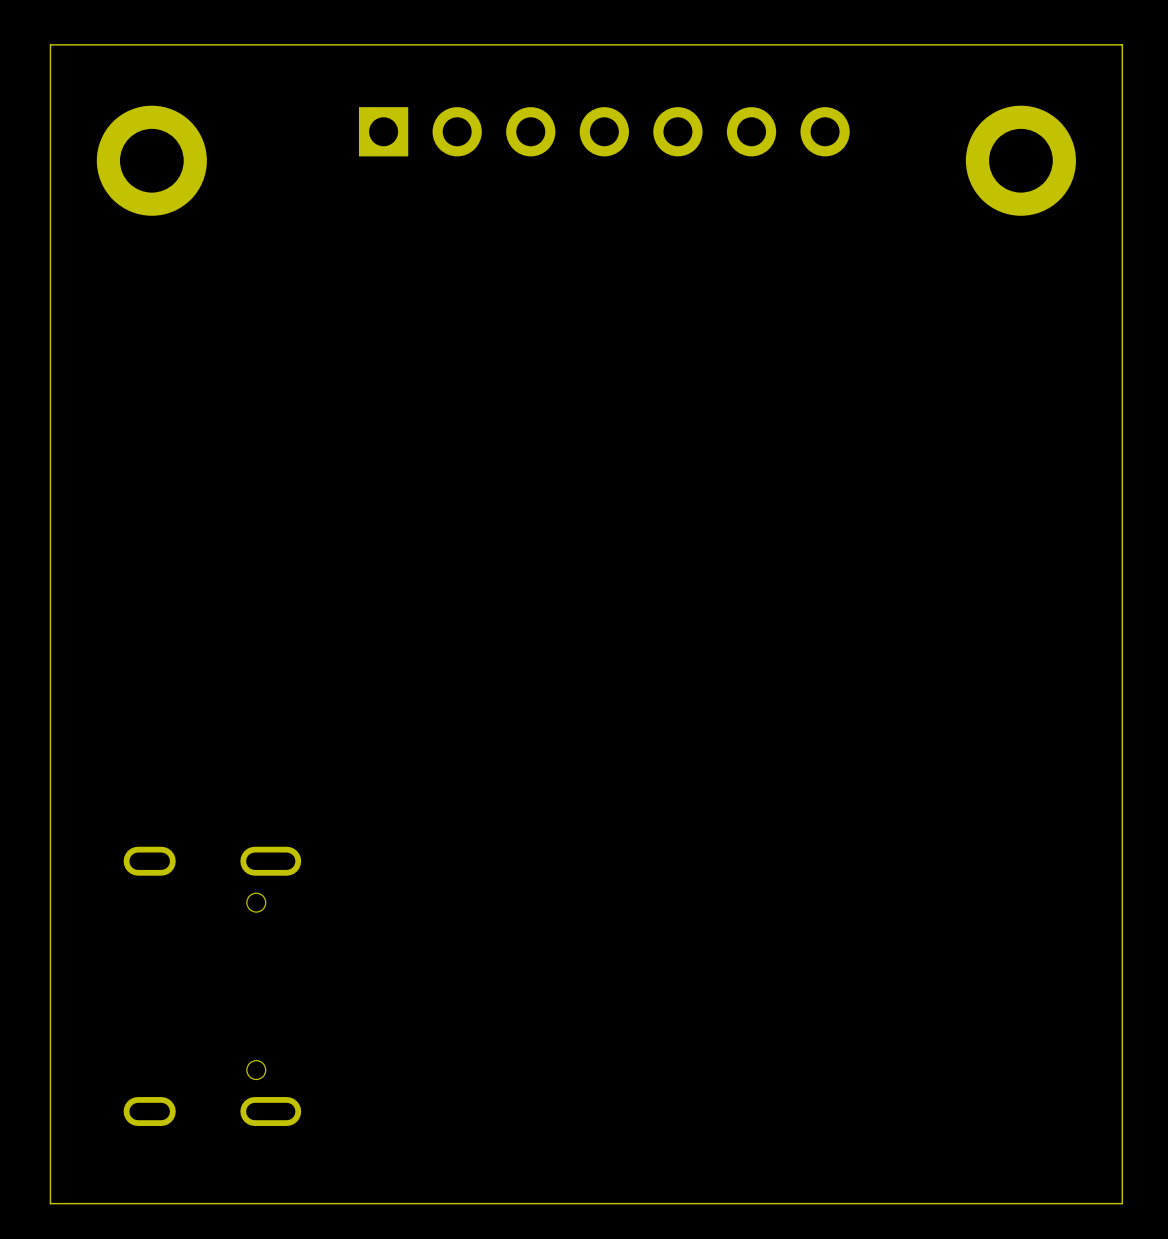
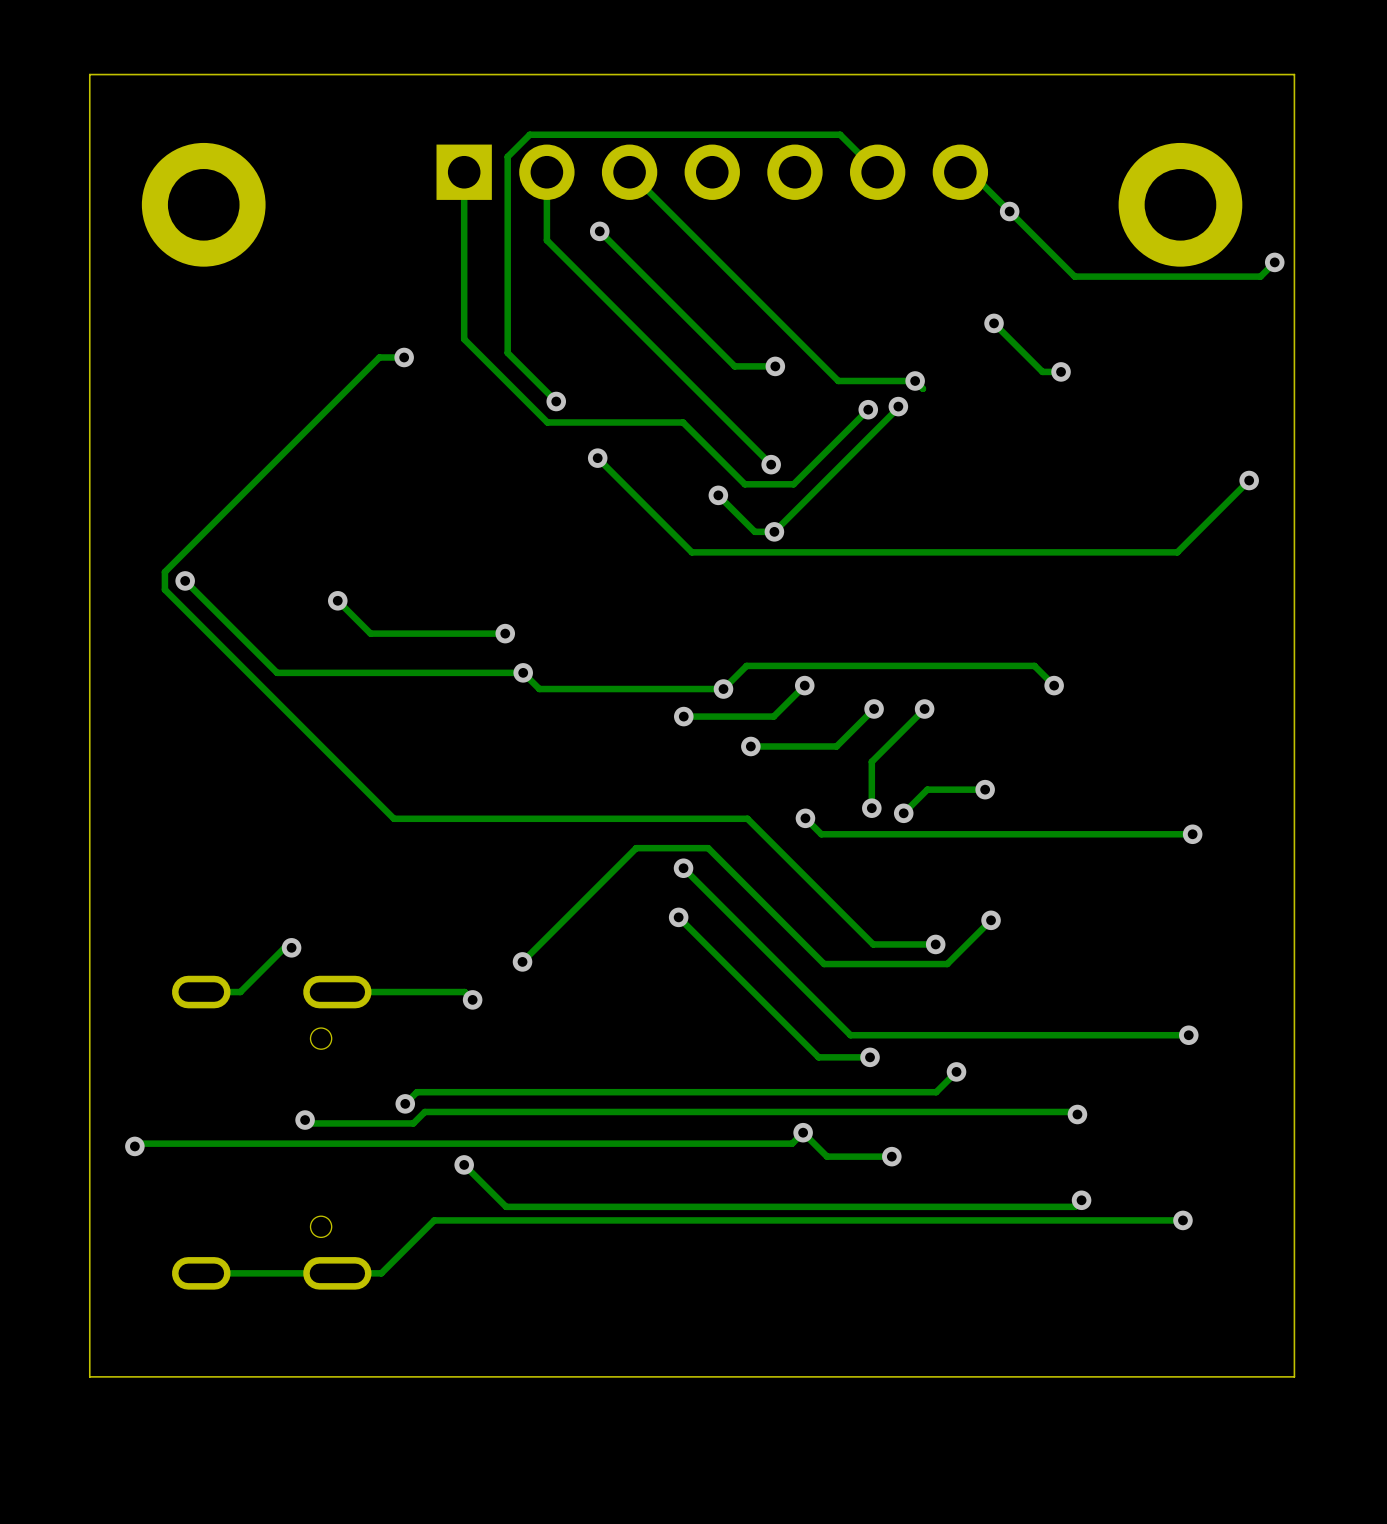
track: none -> (464, 172) (464, 339) (547, 422) (683, 422) (744, 484) (793, 484) (868, 409)
track: none -> (546, 172) (546, 240) (771, 464)
track: none -> (629, 172) (838, 380) (915, 380) (922, 388)
track: none -> (877, 172) (840, 134) (529, 134) (507, 156) (507, 352) (556, 401)
track: none -> (960, 172) (970, 172) (1074, 276) (1260, 276) (1274, 262)
via: none -> (1009, 211)
track: none -> (599, 231) (734, 366) (775, 366)
via: none -> (599, 231)
via: none -> (1274, 262)
track: none -> (994, 323) (1042, 371) (1061, 371)
via: none -> (994, 323)
track: none -> (404, 357) (379, 357) (164, 572) (164, 589) (393, 818) (747, 818) (873, 944) (935, 944)
via: none -> (404, 357)
via: none -> (775, 366)
via: none -> (1061, 371)
via: none -> (915, 380)
via: none -> (556, 401)
track: none -> (897, 405) (898, 407) (774, 531) (754, 531) (718, 495)
via: none -> (898, 406)
via: none -> (868, 409)
track: none -> (597, 458) (691, 552) (1177, 552) (1249, 480)
via: none -> (597, 458)
via: none -> (771, 464)
via: none -> (1249, 480)
via: none -> (718, 495)
via: none -> (774, 531)
track: none -> (185, 580) (277, 672) (523, 672) (539, 689) (723, 689) (746, 665) (1034, 665) (1054, 685)
via: none -> (185, 580)
track: none -> (337, 600) (370, 633) (505, 633)
via: none -> (337, 600)
via: none -> (505, 633)
via: none -> (523, 672)
track: none -> (804, 685) (773, 716) (683, 716)
via: none -> (804, 685)
via: none -> (1054, 685)
via: none -> (723, 689)
track: none -> (874, 708) (836, 746) (750, 746)
via: none -> (874, 708)
track: none -> (924, 709) (871, 761) (871, 808)
via: none -> (924, 709)
via: none -> (683, 716)
via: none -> (750, 746)
track: none -> (985, 789) (927, 789) (903, 813)
via: none -> (985, 789)
via: none -> (871, 808)
via: none -> (903, 813)
track: none -> (805, 818) (821, 834) (1192, 834)
via: none -> (805, 818)
via: none -> (1192, 834)
track: none -> (683, 868) (850, 1035) (1188, 1035)
via: none -> (683, 868)
track: none -> (678, 917) (818, 1057) (870, 1057)
via: none -> (678, 917)
track: none -> (991, 920) (947, 964) (824, 964) (708, 848) (636, 848) (522, 961)
via: none -> (991, 920)
via: none -> (935, 944)
track: none -> (291, 947) (284, 947) (240, 992) (201, 992)
via: none -> (291, 947)
via: none -> (522, 961)
track: none -> (337, 992) (464, 992) (472, 999)
via: none -> (472, 999)
via: none -> (1188, 1035)
via: none -> (870, 1057)
track: none -> (956, 1071) (936, 1092) (416, 1092) (405, 1103)
via: none -> (956, 1071)
via: none -> (405, 1103)
track: none -> (1077, 1114) (1074, 1111) (424, 1111) (413, 1123) (308, 1123) (305, 1120)
via: none -> (1077, 1114)
via: none -> (305, 1120)
via: none -> (803, 1132)
track: none -> (134, 1146) (137, 1143) (792, 1143) (803, 1132) (827, 1156) (891, 1156)
via: none -> (134, 1146)
via: none -> (891, 1156)
track: none -> (464, 1164) (506, 1206) (1075, 1206) (1081, 1200)
via: none -> (464, 1164)
via: none -> (1081, 1200)
track: none -> (1182, 1220) (434, 1220) (381, 1273) (201, 1273)
via: none -> (1182, 1220)

